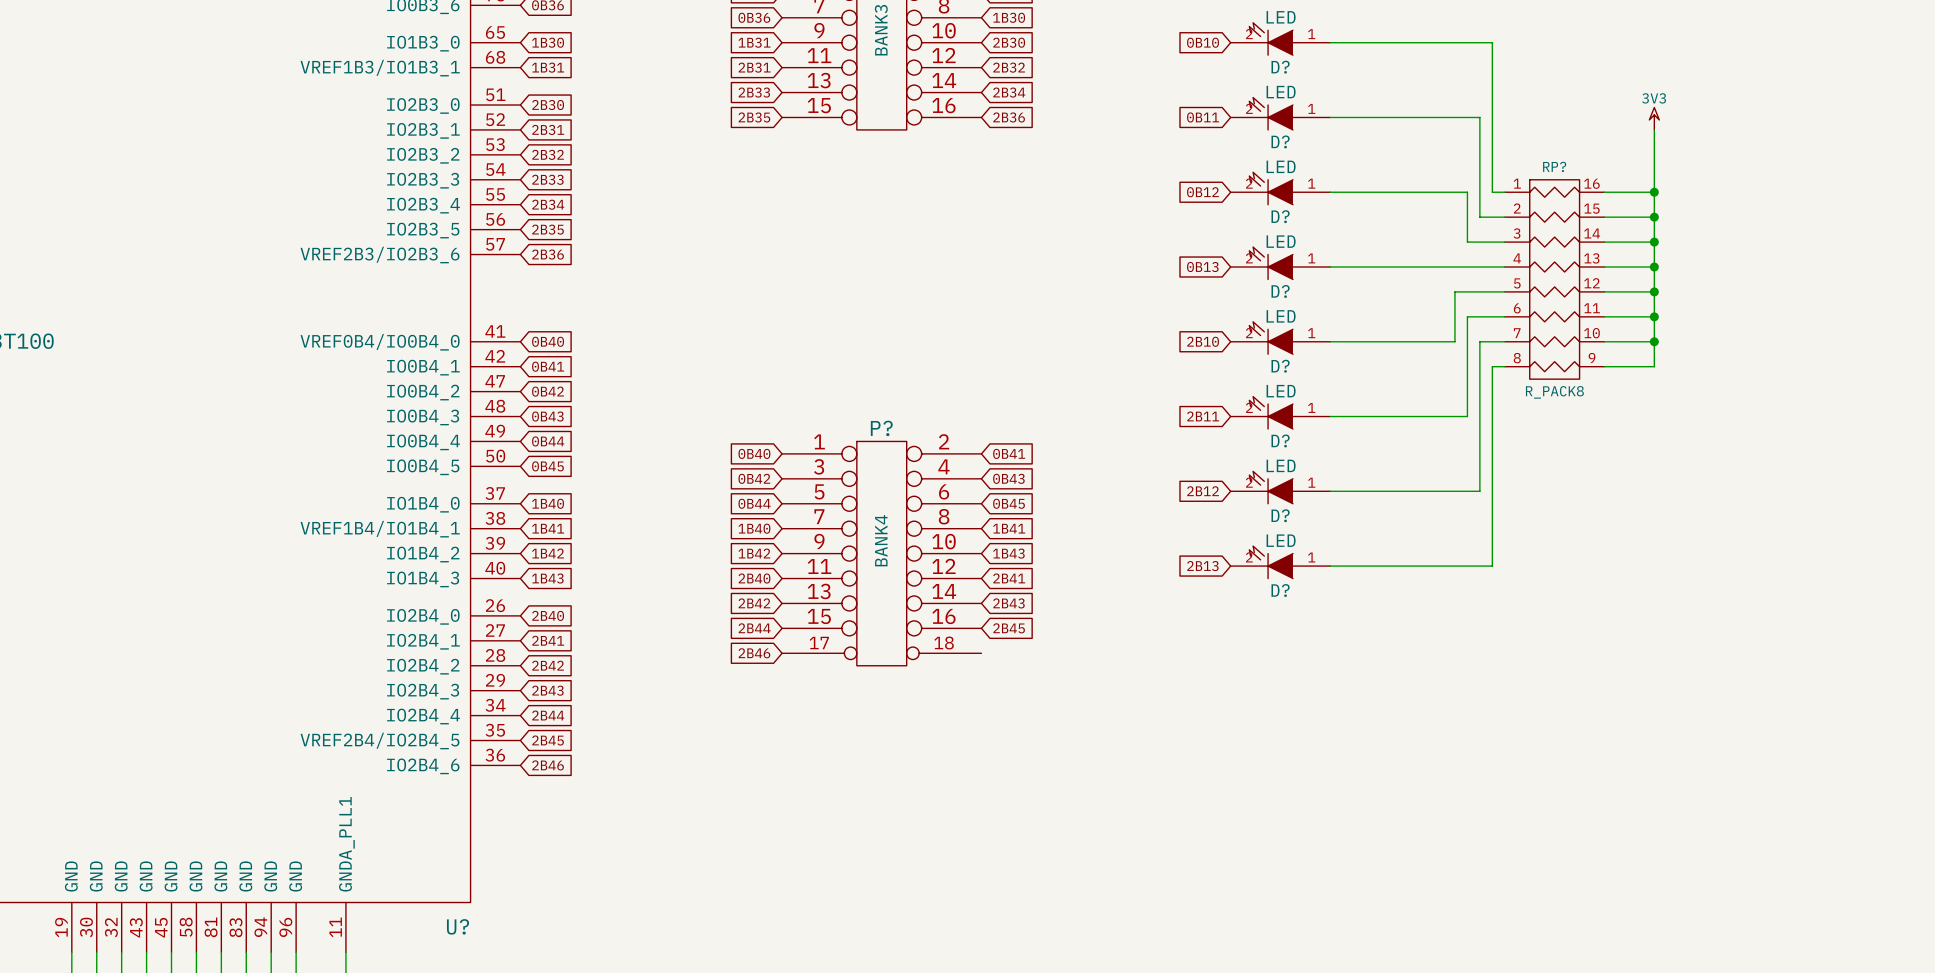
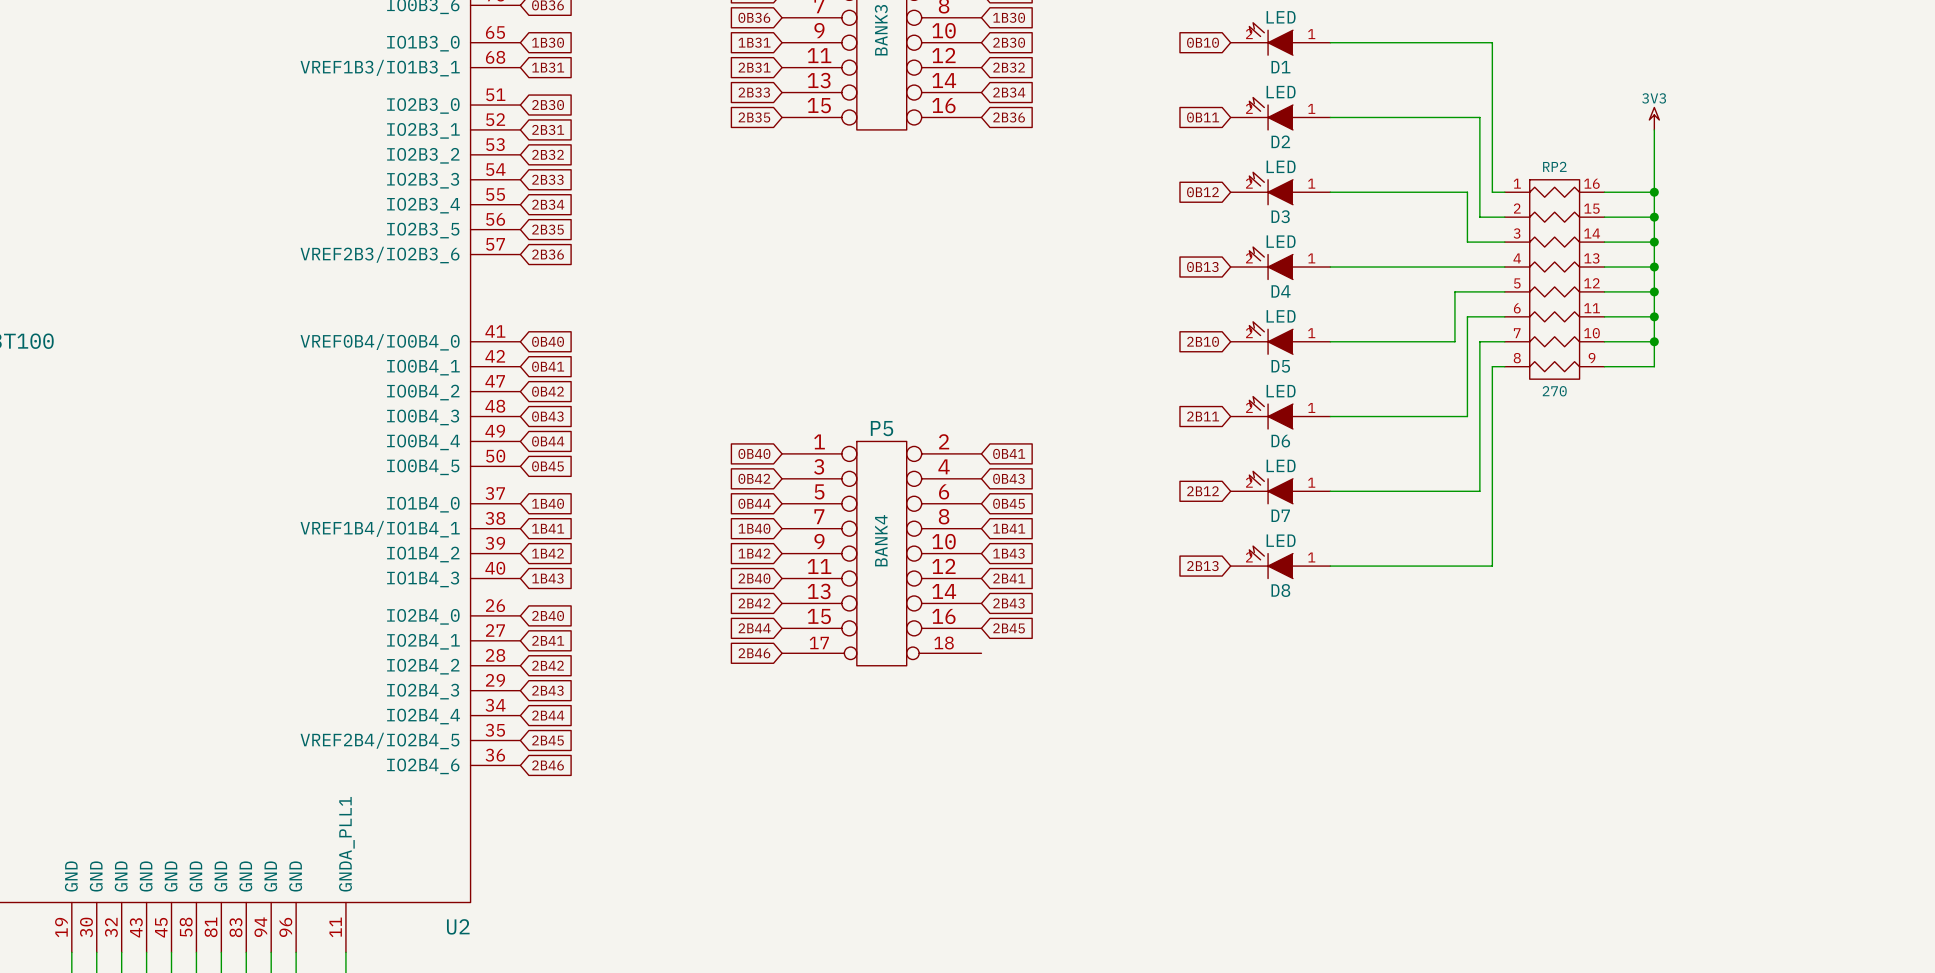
D? name: D? (1280, 67) -> D1 (1280, 67)
D? name: D? (1280, 141) -> D2 (1280, 141)
RP? name: RP? (1554, 166) -> RP2 (1554, 166)
D? name: D? (1280, 216) -> D3 (1280, 216)
D? name: D? (1280, 291) -> D4 (1281, 291)
D? name: D? (1280, 366) -> D5 (1280, 366)
RP? value: R_PACK8 (1554, 392) -> 270 (1554, 391)
P? name: P? (881, 428) -> P5 (882, 428)
D? name: D? (1280, 440) -> D6 (1280, 441)
D? name: D? (1280, 515) -> D7 (1280, 515)
D? name: D? (1280, 590) -> D8 (1280, 590)
U? name: U? (458, 926) -> U2 (458, 926)

